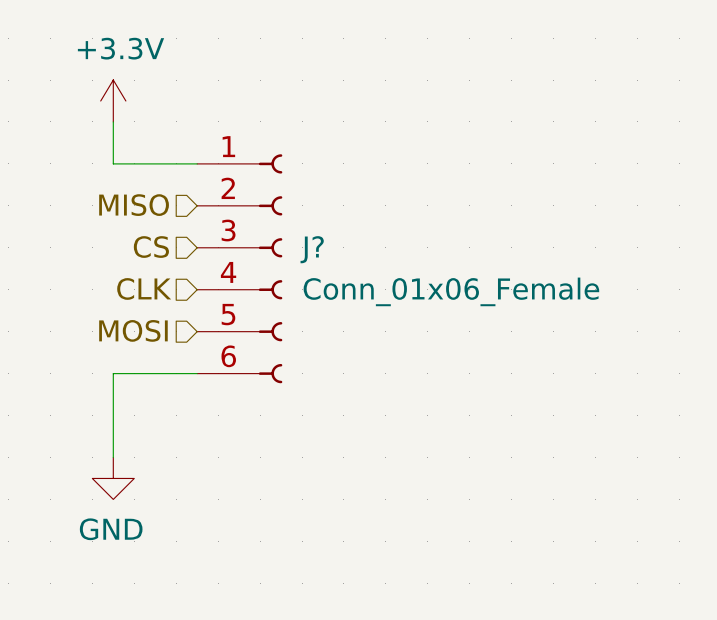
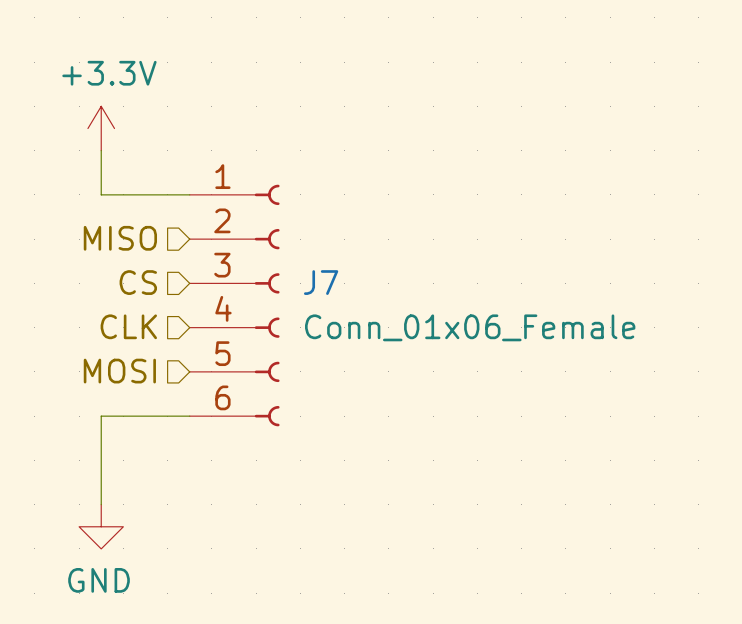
J? name: J? (312, 249) -> J7 (321, 282)

